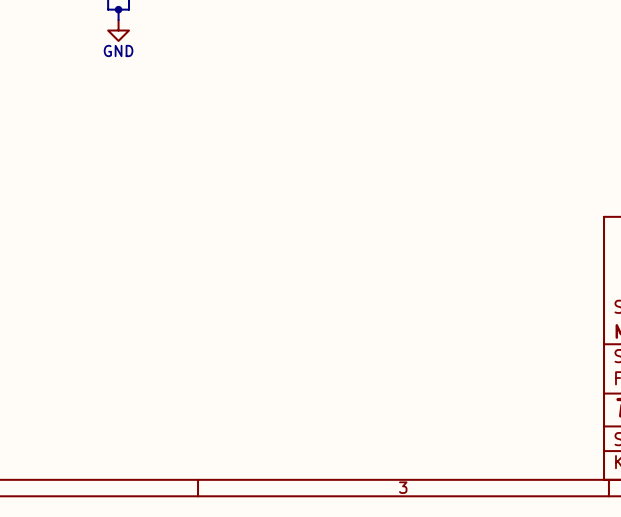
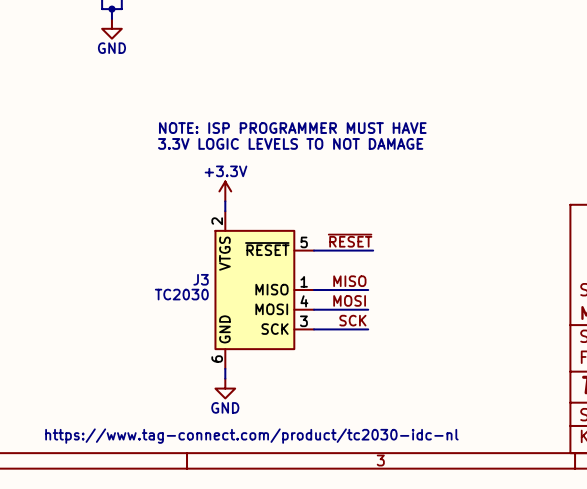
text: none -> NOTE: ISP PROGRAMMER MUST HAVE (292, 128)
text: none -> 3.3V LOGIC LEVELS TO NOT DAMAGE (290, 143)
power symbol: none -> +3.3V (225, 191)
wire: none -> (225, 201) (225, 211)
label: none -> ~{RESET} (350, 240)
wire: none -> (314, 250) (373, 250)
label: none -> MISO (349, 281)
J3: none -> TC2030 (264, 290)
wire: none -> (314, 290) (368, 290)
label: none -> MOSI (349, 300)
wire: none -> (314, 309) (368, 309)
label: none -> SCK (352, 320)
wire: none -> (314, 329) (368, 329)
wire: none -> (225, 368) (225, 378)
power symbol: none -> GND (225, 388)
text: none -> https://www.tag-connect.com/product/tc2030-idc-nl (251, 436)

